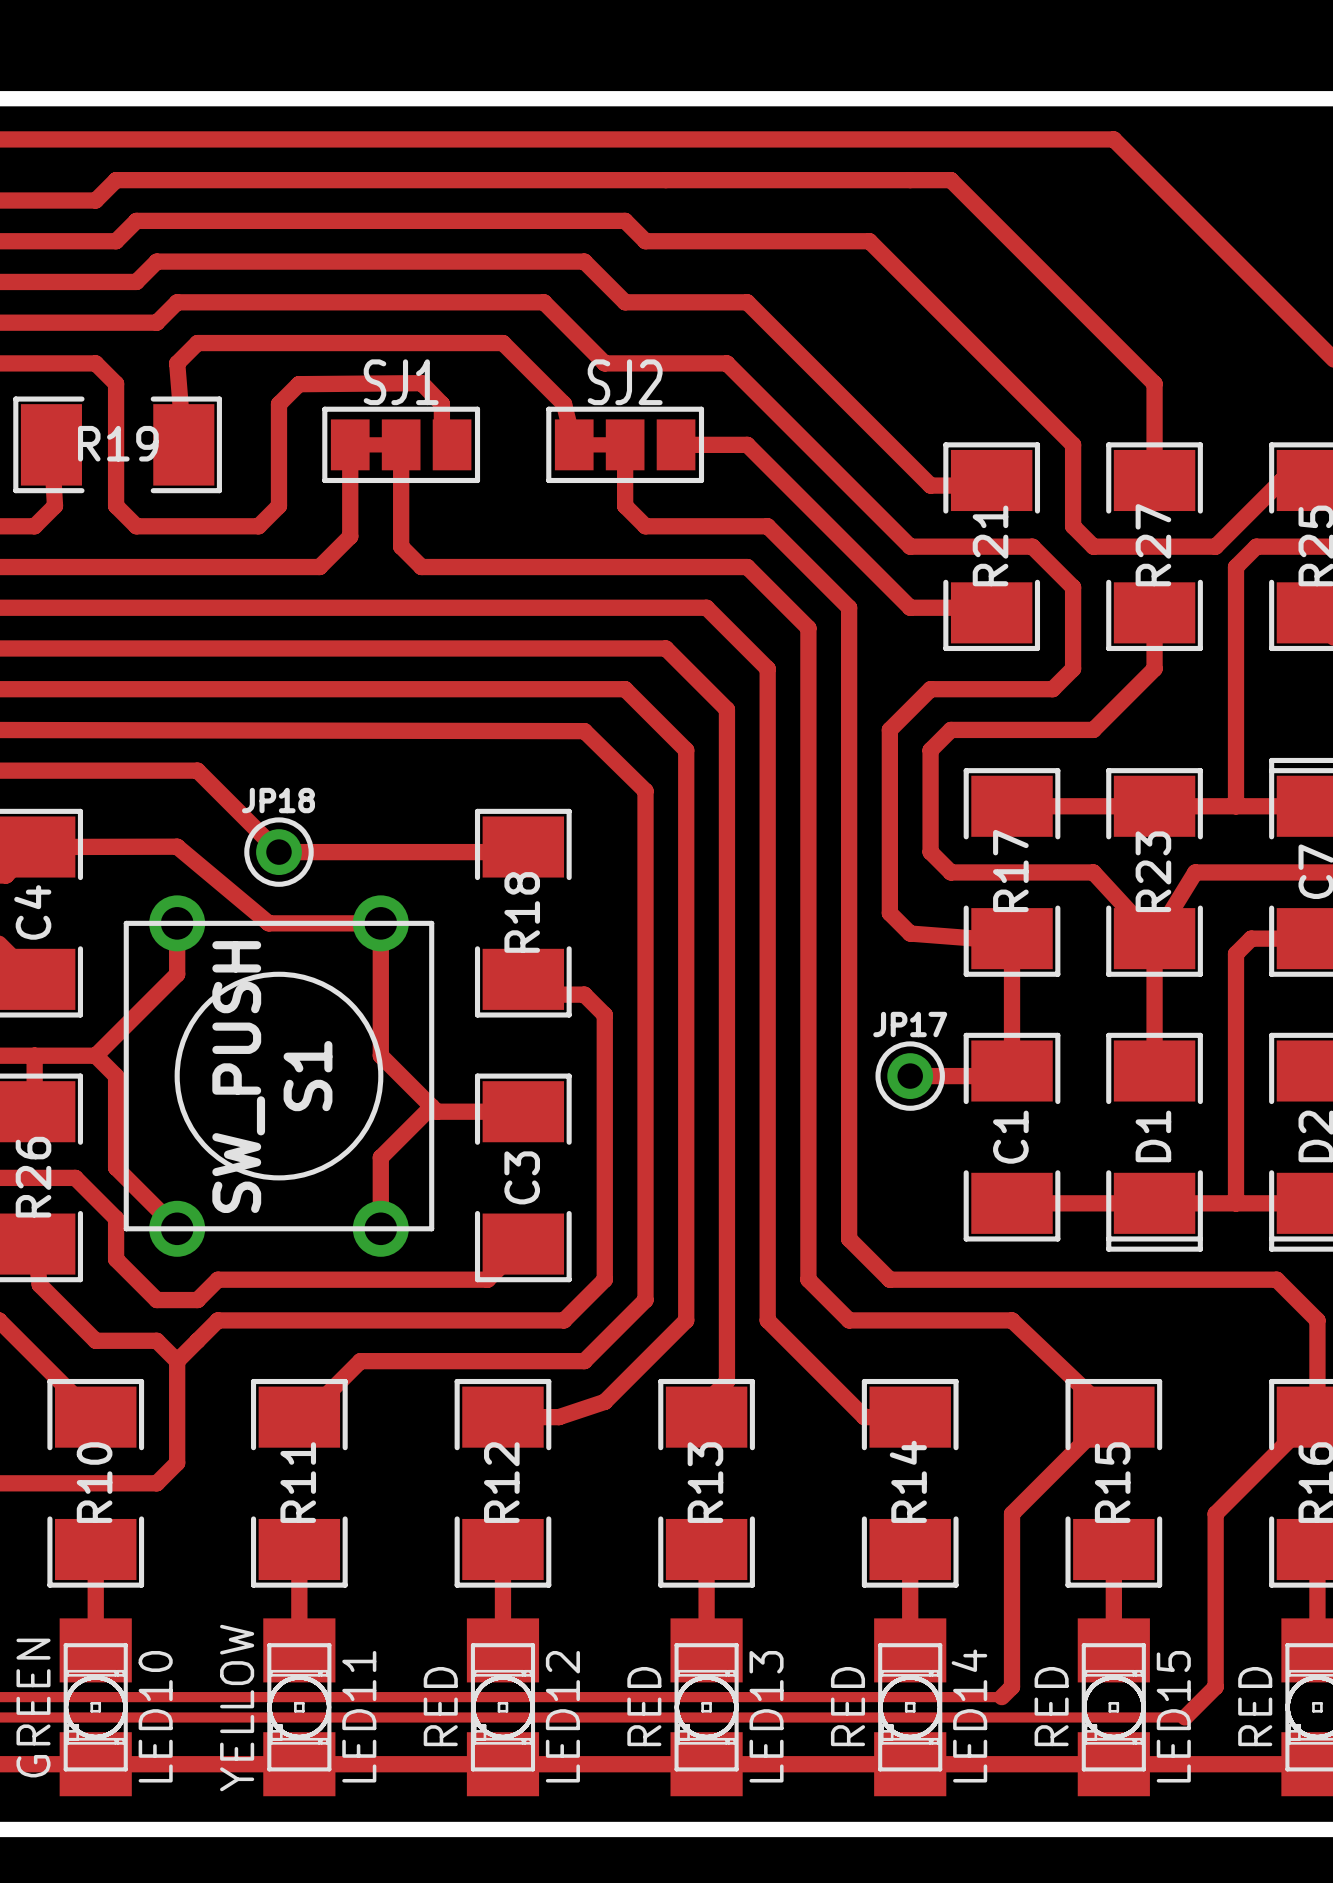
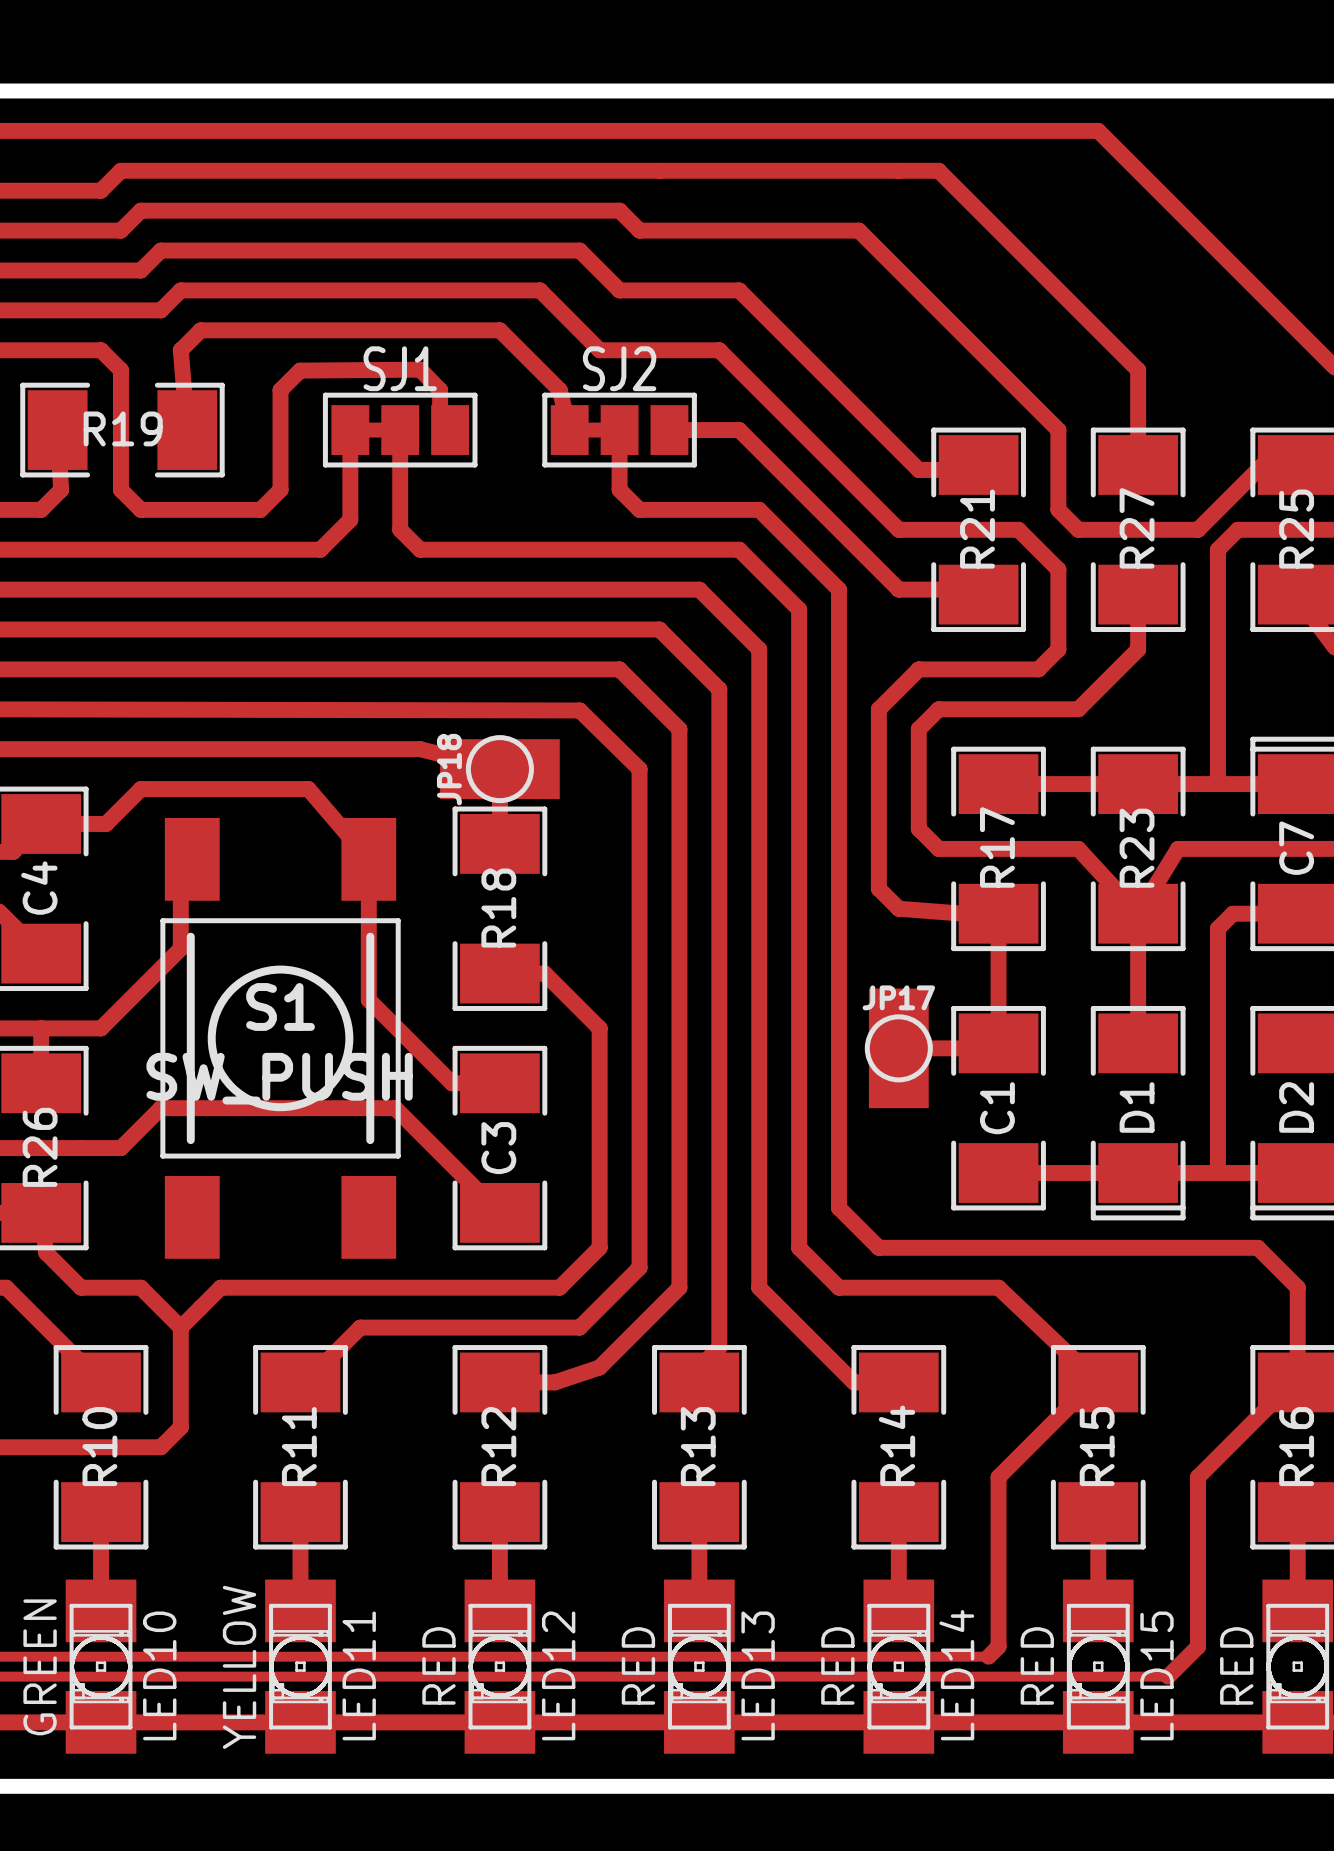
top track: (197, 770) (278, 852) (518, 852) (523, 847) -> (200, 749) (420, 749) (499, 769) (499, 843)
JP18 footprint: [244, 817, 314, 887] -> [440, 735, 560, 804]
top track: (34, 847) (177, 846) (268, 923) (380, 923) (380, 1055) (436, 1111) (454, 1111) -> (41, 823) (106, 823) (140, 789) (308, 789) (368, 859) (368, 999) (452, 1083)
S1 footprint: [123, 895, 435, 1257] -> [160, 817, 401, 1259]
R18 position: (523, 913) -> (499, 908)
top track: (523, 979) (538, 994) (584, 994) (604, 1014) (604, 1055) -> (499, 973) (544, 973) (599, 1028)
JP17 footprint: [875, 1041, 945, 1111] -> [864, 988, 933, 1109]
top track: (95, 1055) (116, 1076) (116, 1167) (177, 1228) -> none
top track: (431, 1106) (380, 1157) (380, 1228) -> none
top track: (75, 1177) (116, 1218) (116, 1259) (156, 1300) (197, 1300) (217, 1279) (487, 1279) (523, 1244) -> (81, 1148) (120, 1148) (160, 1108) (395, 1108) (499, 1212)
C3 position: (523, 1177) -> (499, 1148)
top track: (75, 1320) (95, 1340) (156, 1340) -> (81, 1287) (140, 1287) (160, 1307)

